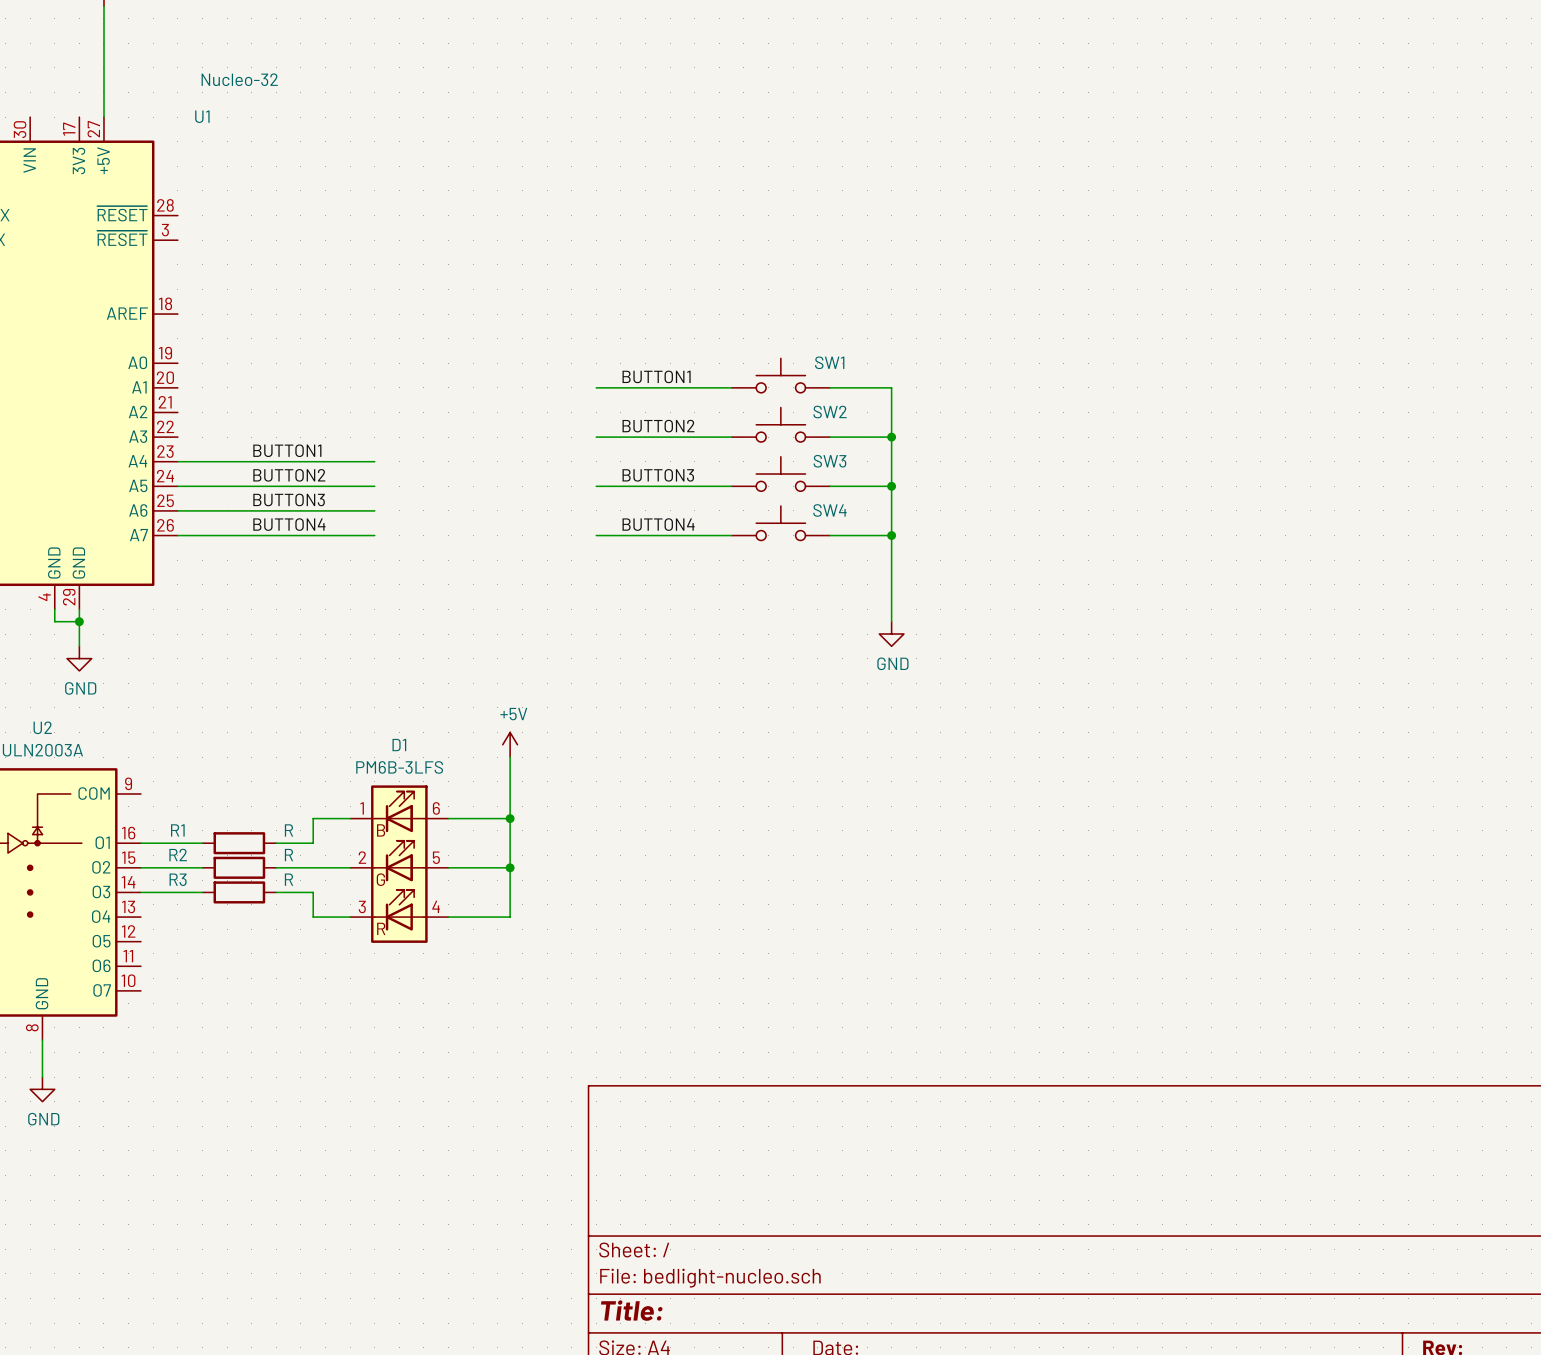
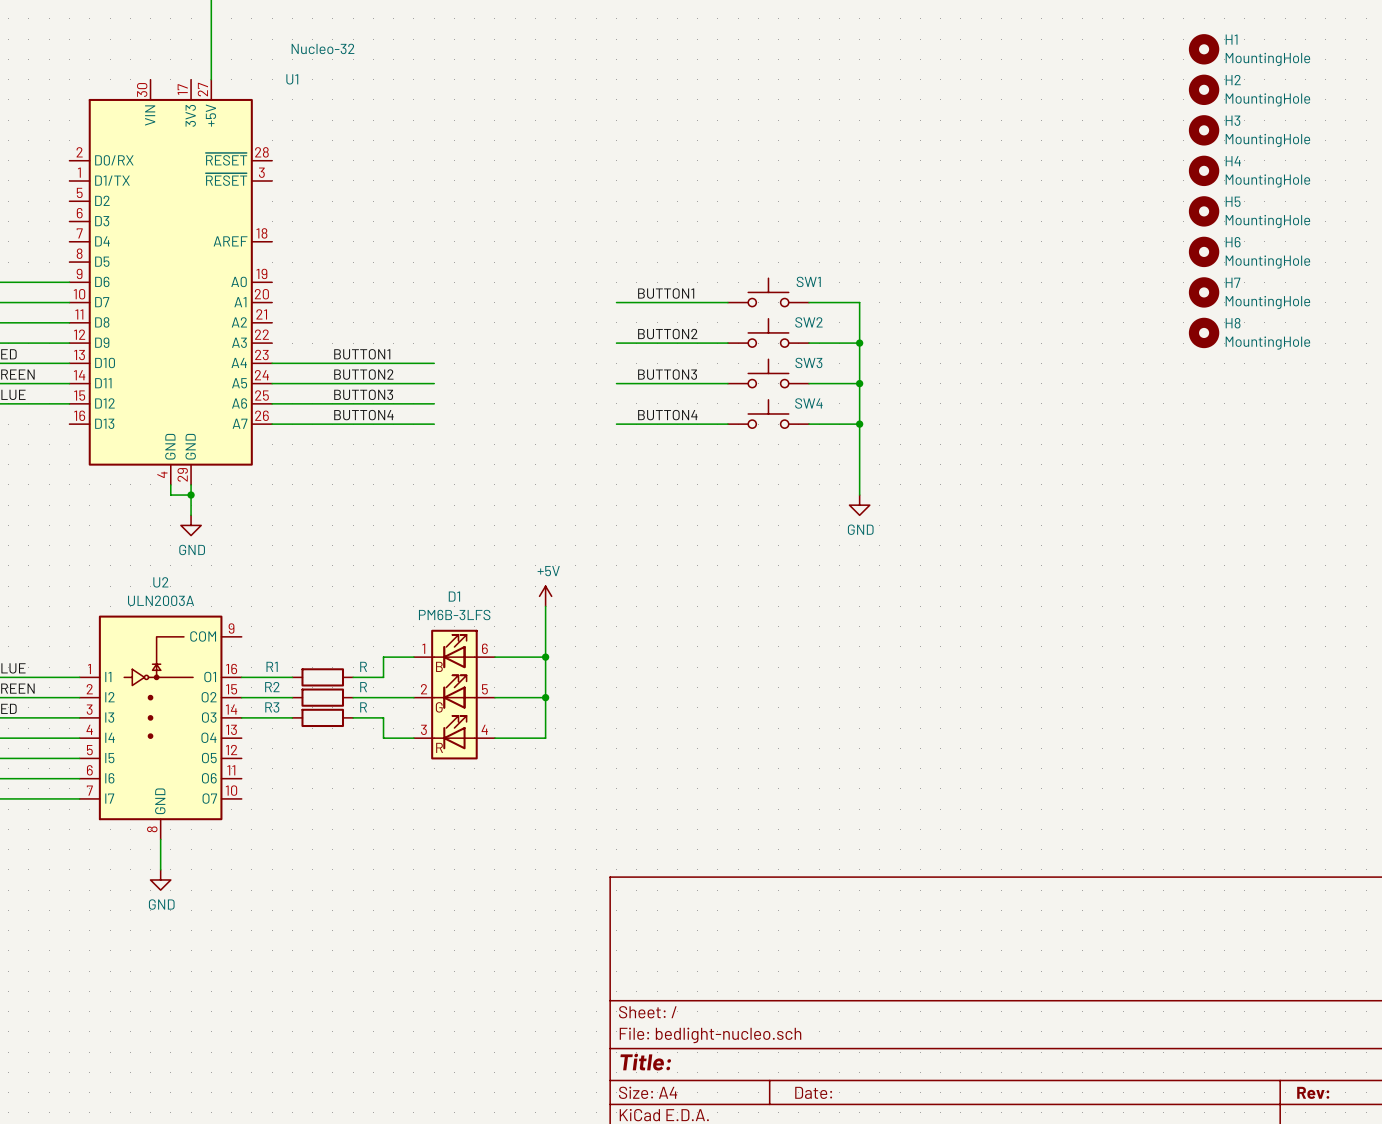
H1: none -> MountingHole (1204, 49)
H2: none -> MountingHole (1204, 89)
H3: none -> MountingHole (1204, 130)
H4: none -> MountingHole (1204, 170)
H5: none -> MountingHole (1204, 211)
H6: none -> MountingHole (1204, 251)
H7: none -> MountingHole (1204, 292)
H8: none -> MountingHole (1204, 332)

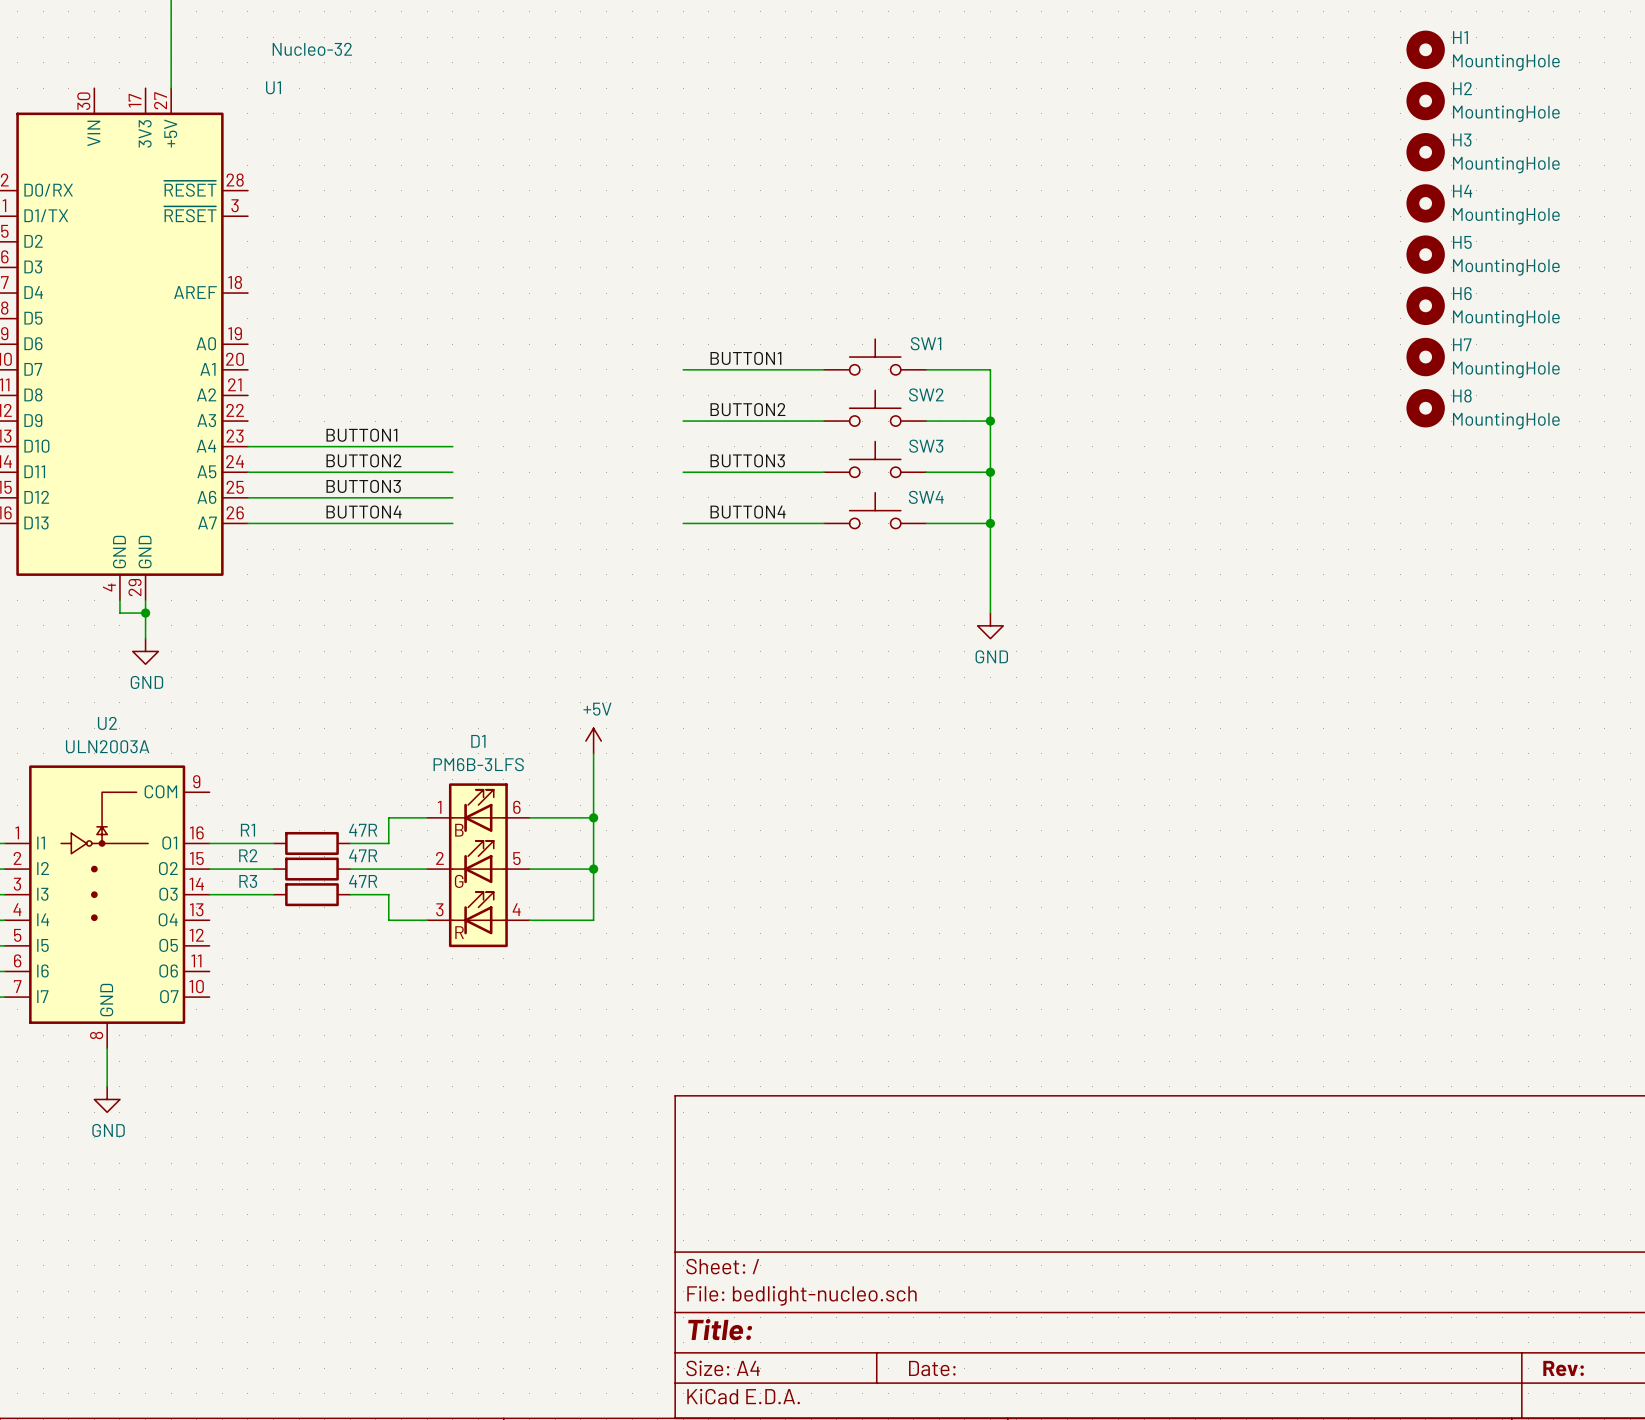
R1 value: R (363, 666) -> 47R (363, 830)
R2 value: R (363, 687) -> 47R (363, 855)
R3 value: R (363, 707) -> 47R (363, 881)

